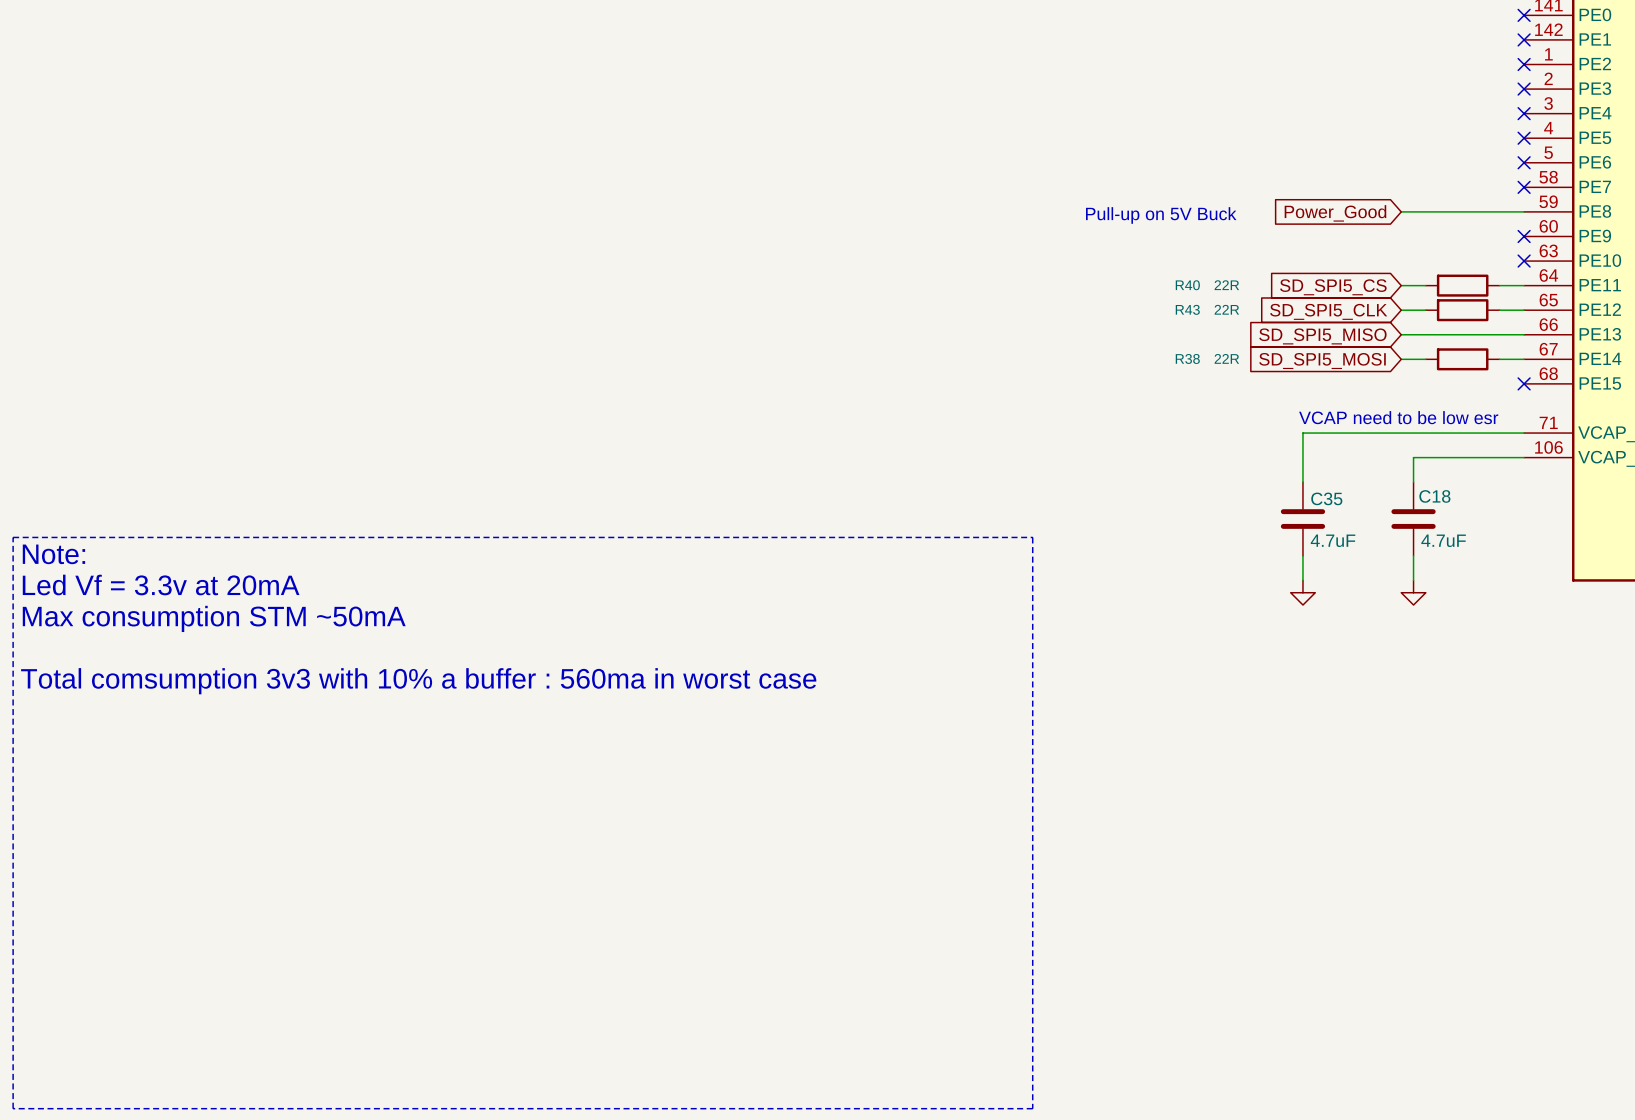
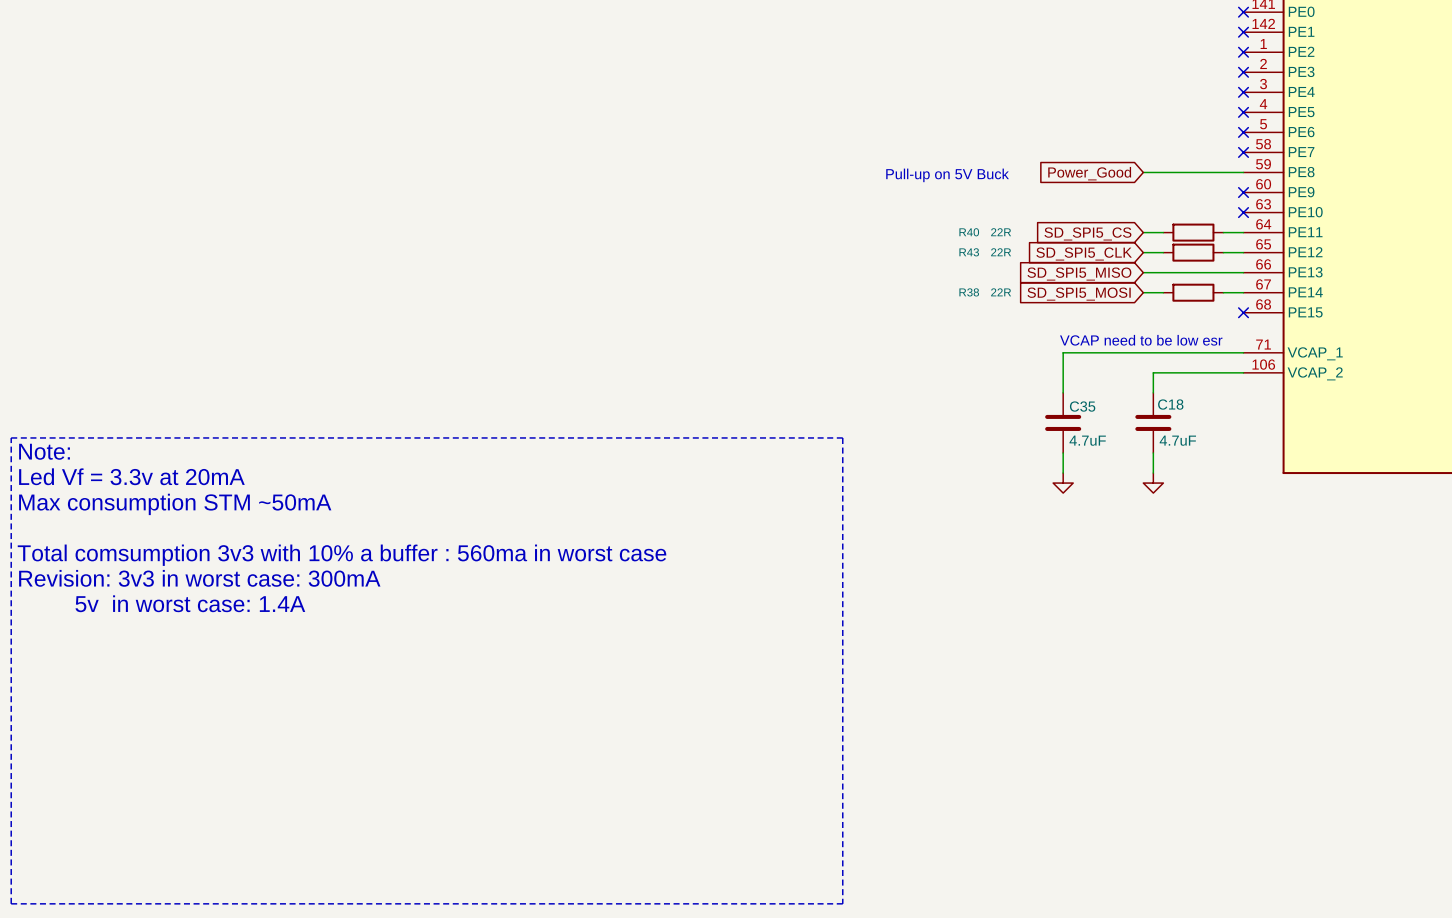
text: none -> Revision: 3v3 in worst case: 300mA (199, 578)
text: none -> 5v in worst case: 1.4A (190, 603)

